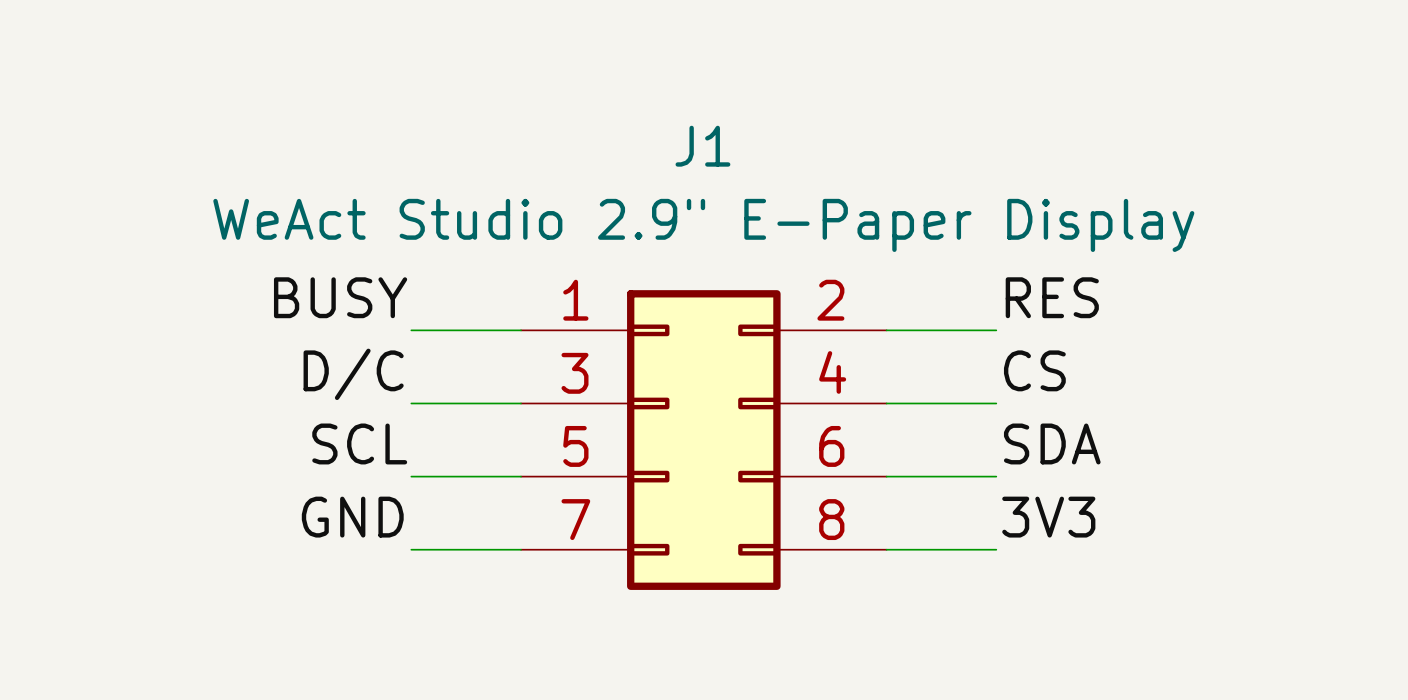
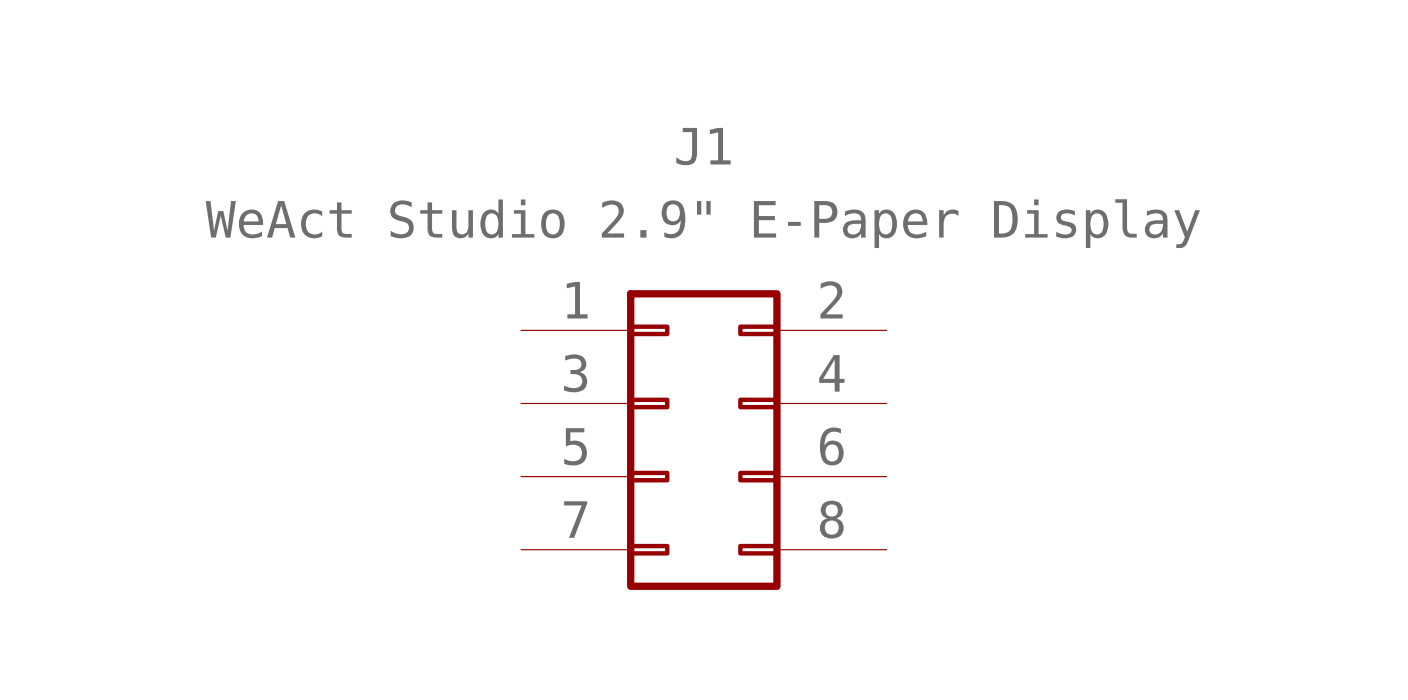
label: BUSY (340, 297) -> none
label: RES (1052, 297) -> none
wire: (411, 330) (521, 330) -> none
wire: (886, 330) (996, 330) -> none
label: CS (1034, 370) -> none
label: D/C (353, 374) -> none
wire: (411, 403) (521, 403) -> none
wire: (886, 403) (996, 403) -> none
label: SCL (359, 443) -> none
label: SDA (1052, 443) -> none
wire: (411, 476) (521, 476) -> none
wire: (886, 476) (996, 476) -> none
label: GND (352, 517) -> none
label: 3V3 (1048, 517) -> none
wire: (411, 549) (521, 549) -> none
wire: (886, 549) (996, 549) -> none

